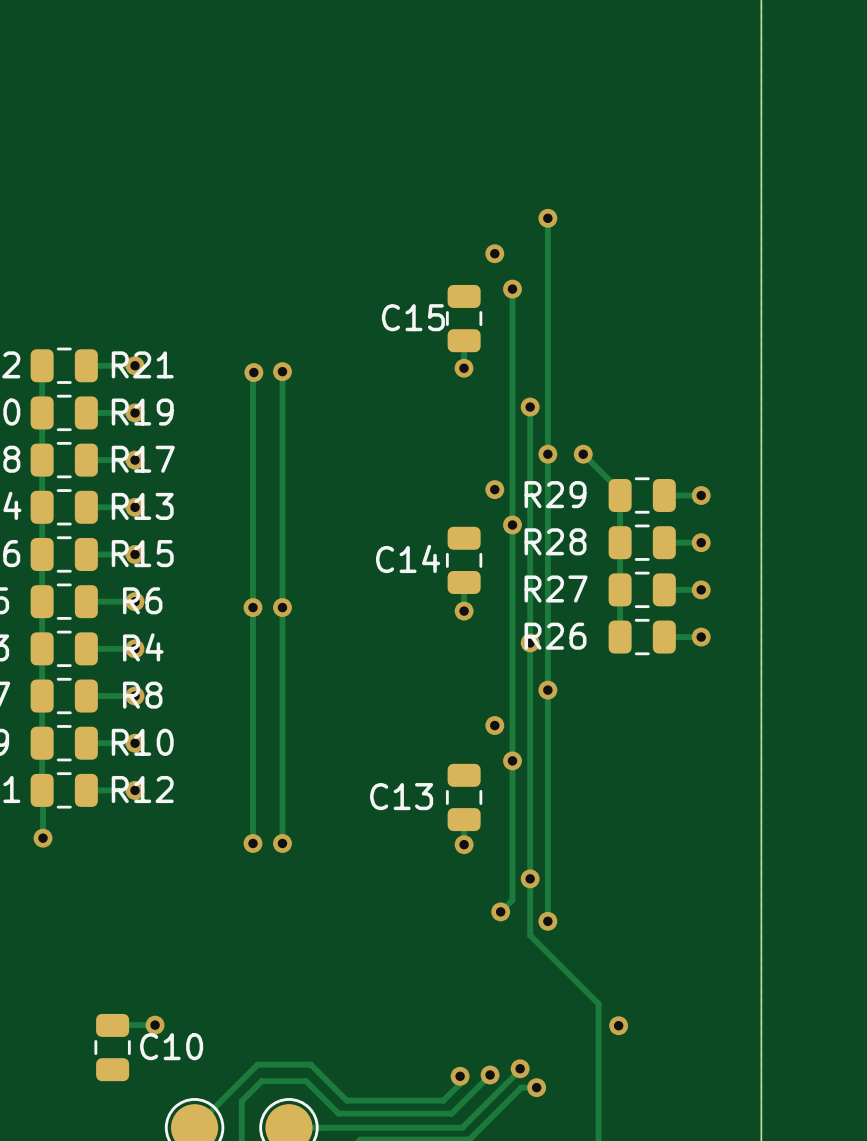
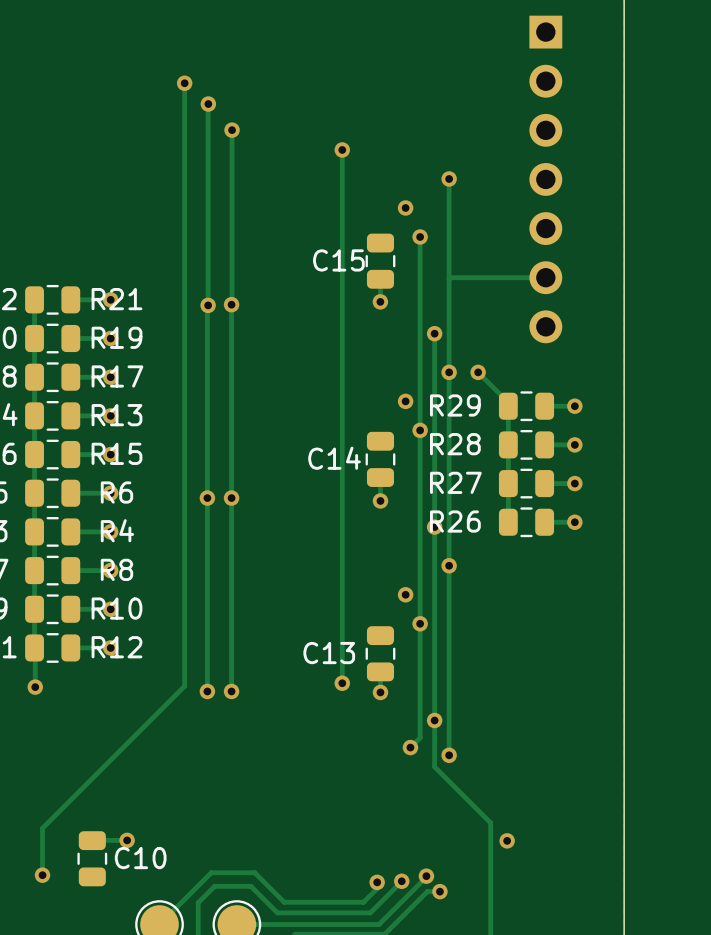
track: none -> (184, 83) (184, 686) (42, 828) (42, 875)
via: none -> (184, 83)
via: none -> (208, 104)
track: none -> (208, 104) (208, 305)
track: none -> (232, 130) (231, 304)
via: none -> (232, 130)
track: none -> (342, 149) (342, 683)
via: none -> (342, 149)
part: none -> (545, 179)
track: none -> (545, 277) (449, 279)
via: none -> (342, 683)
via: none -> (42, 875)

